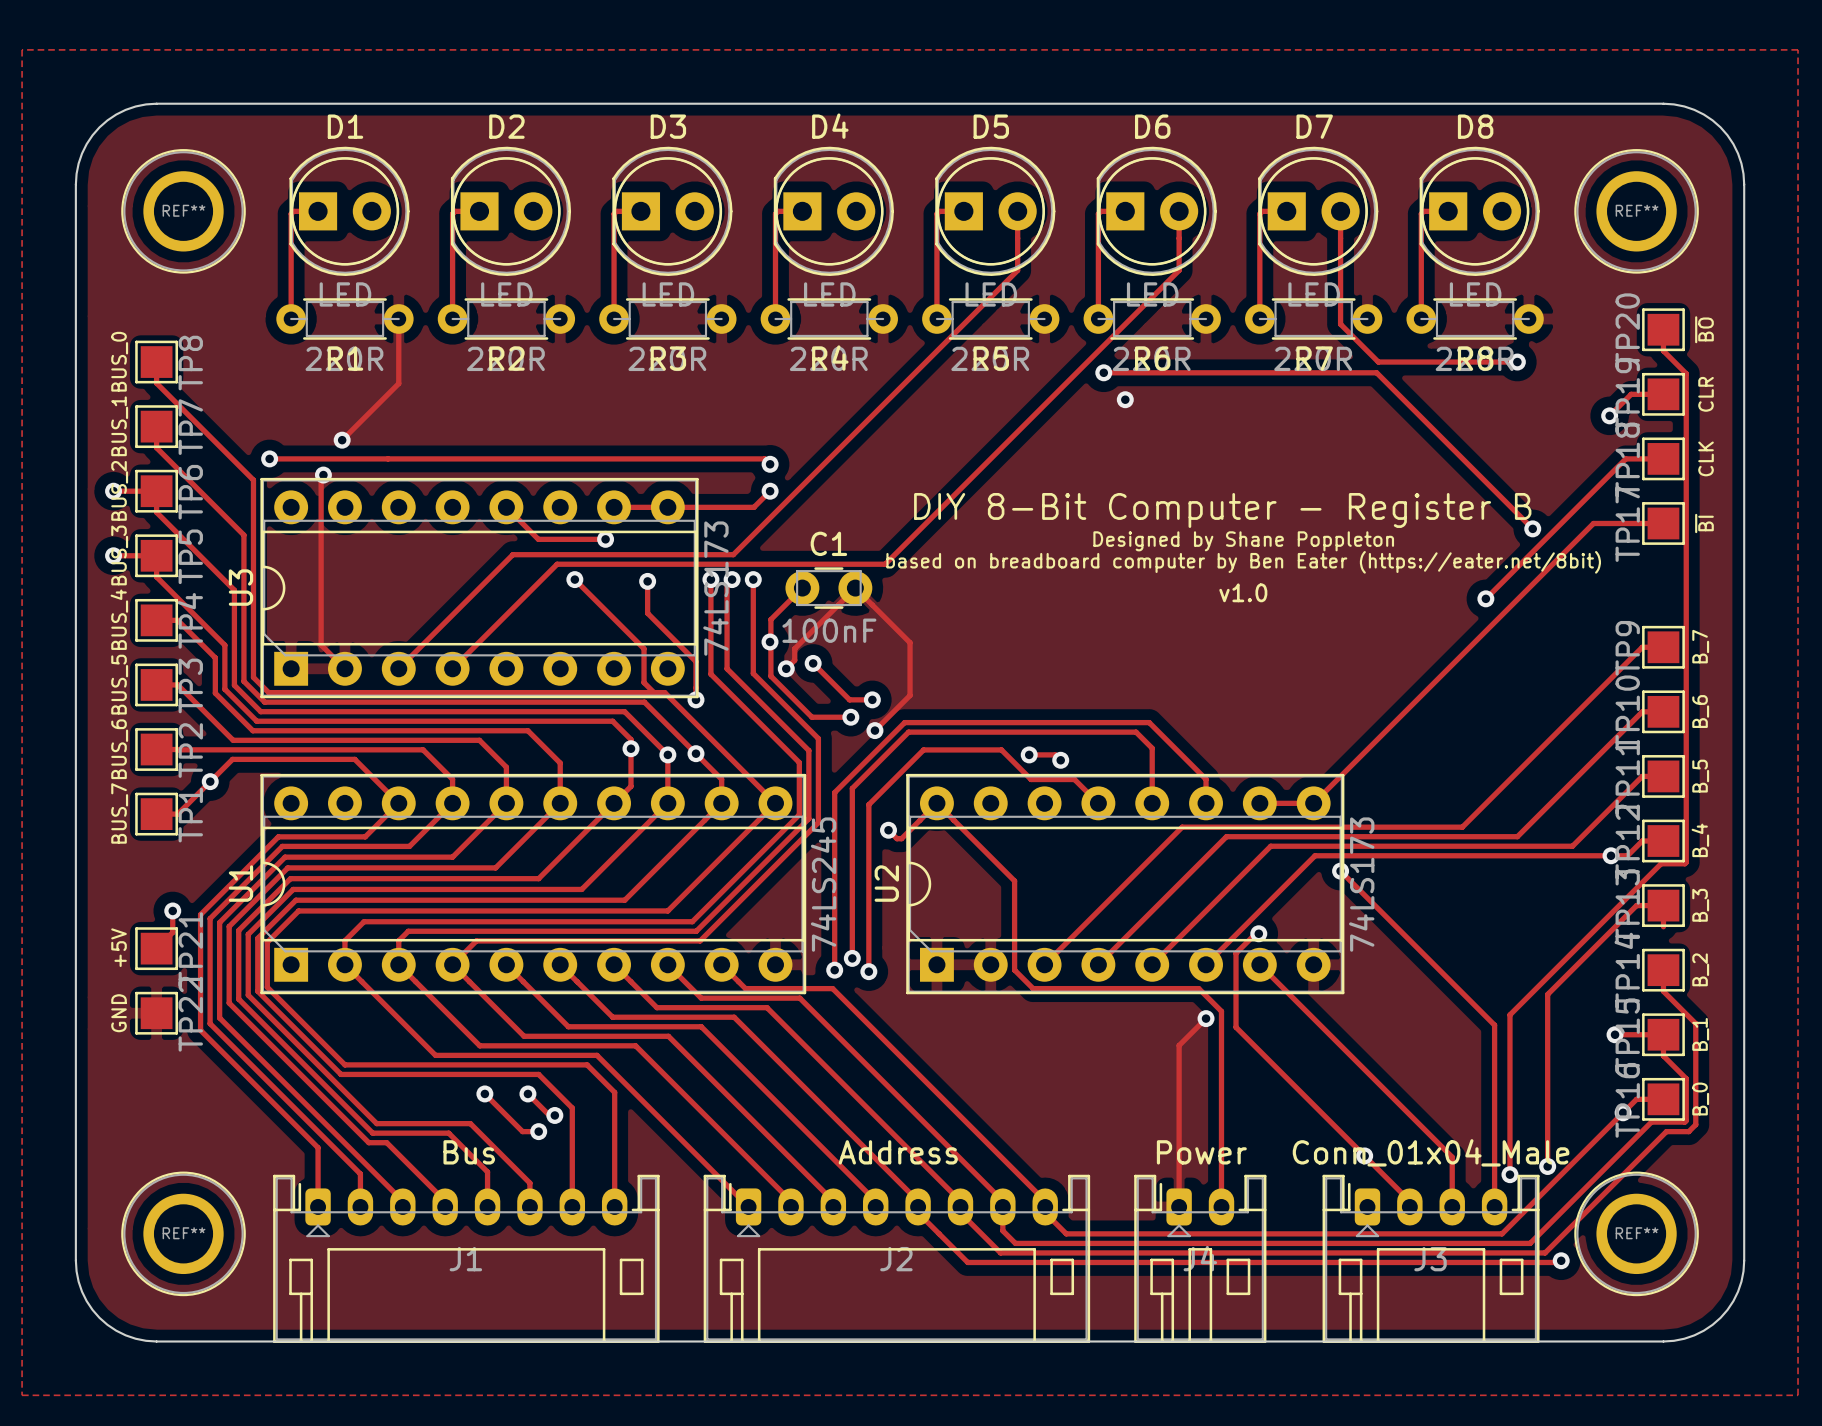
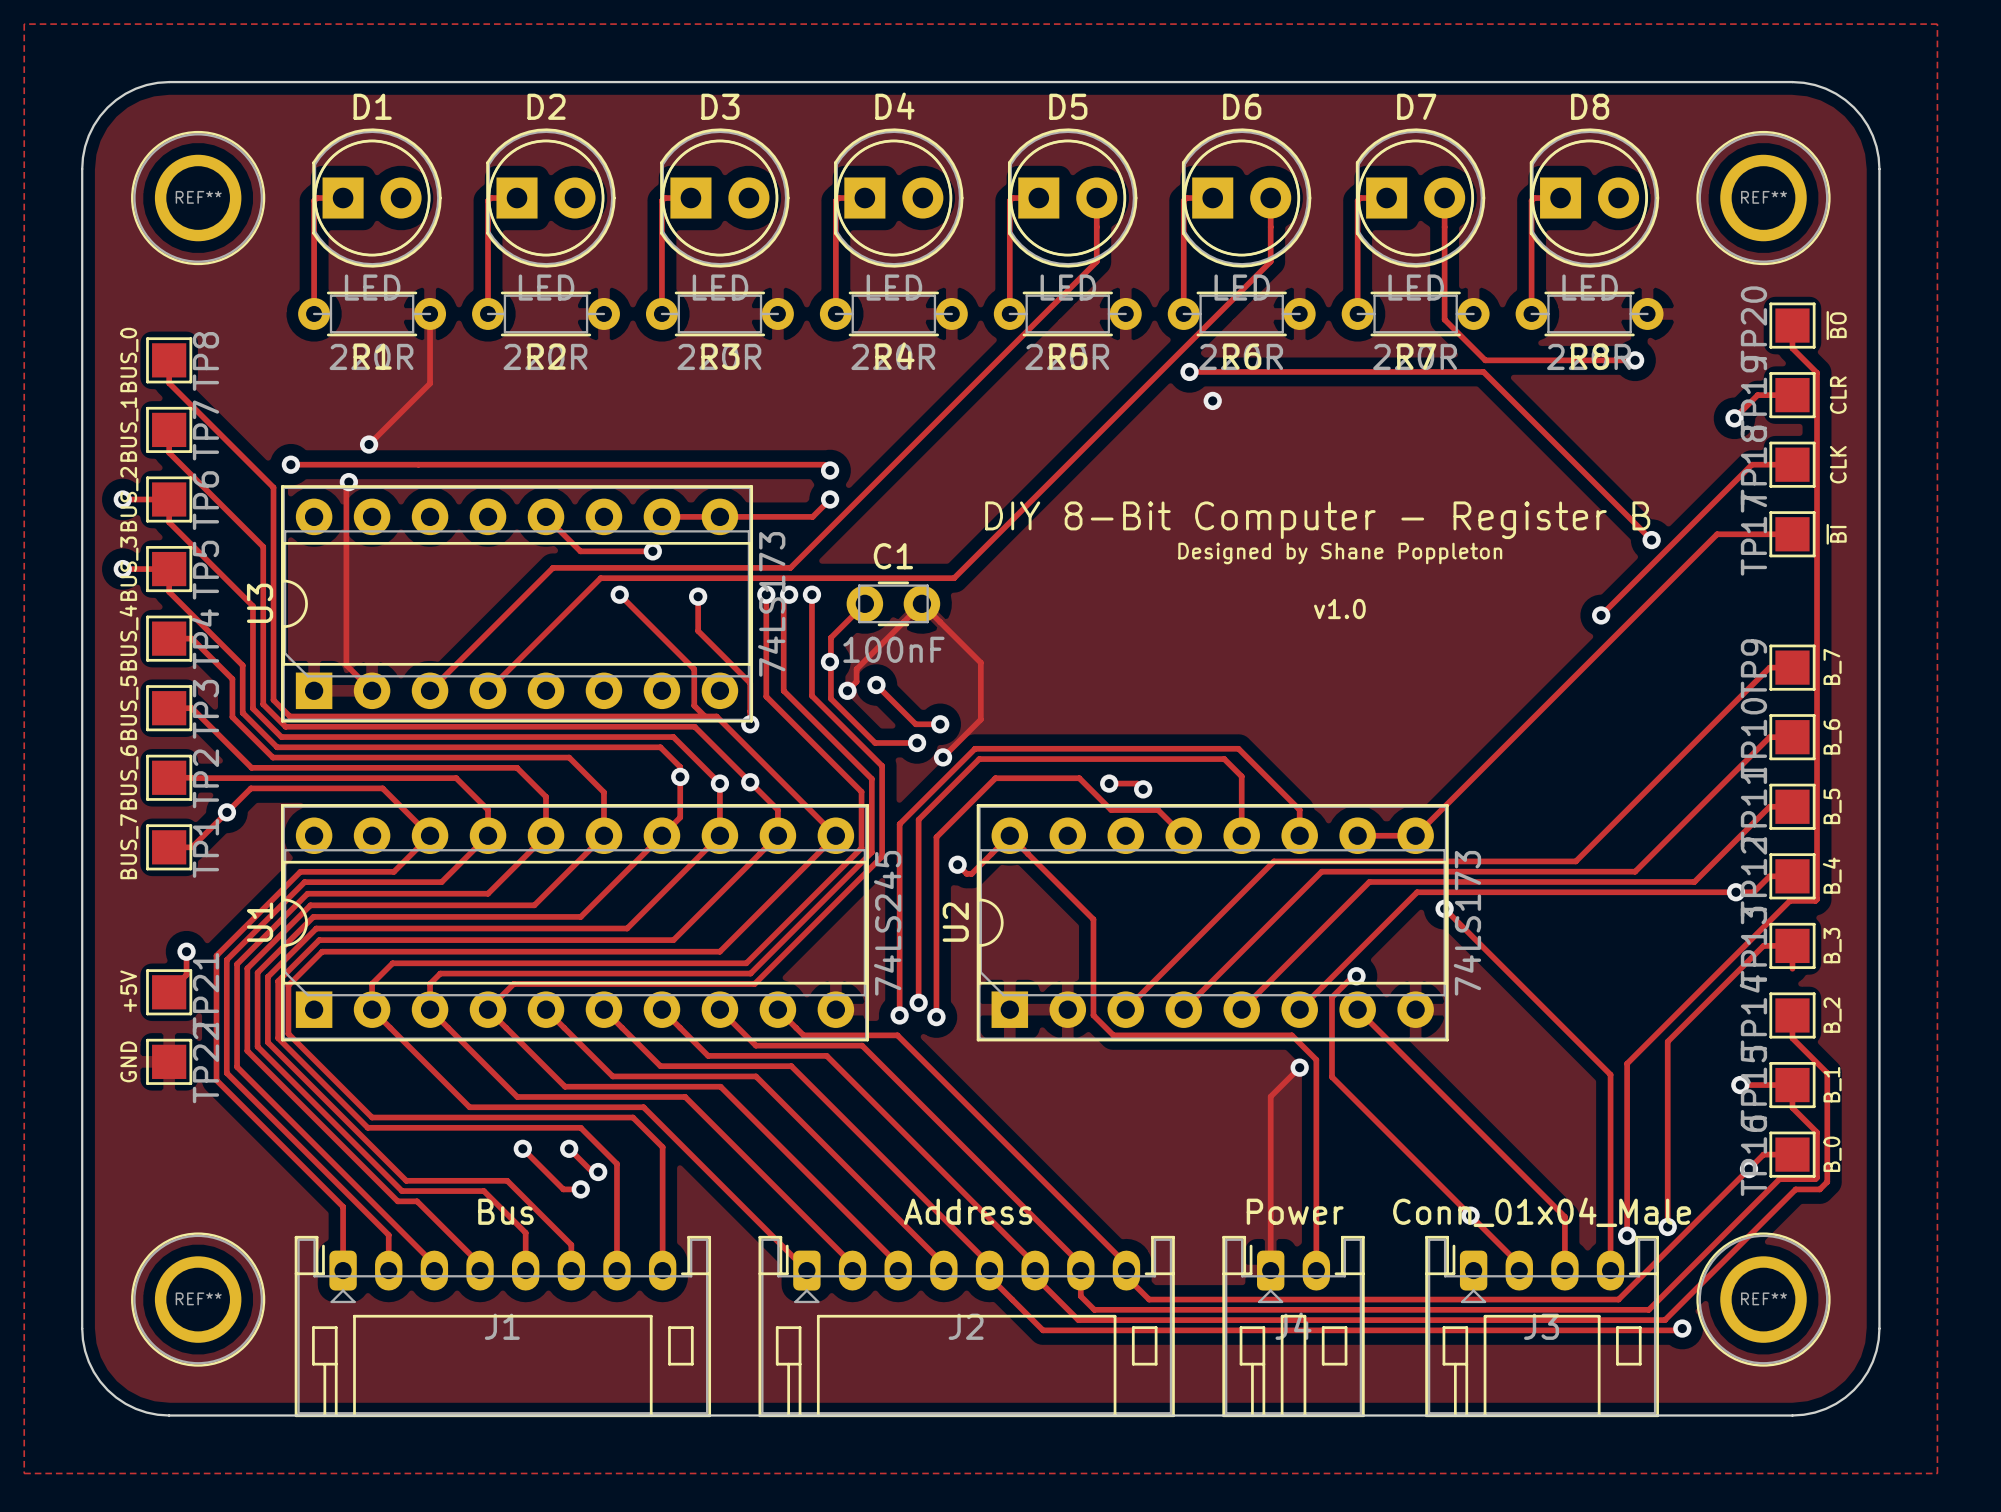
text: based on breadboard computer by Ben Eater (https://eater.net/8bit) (1243, 562) -> none

